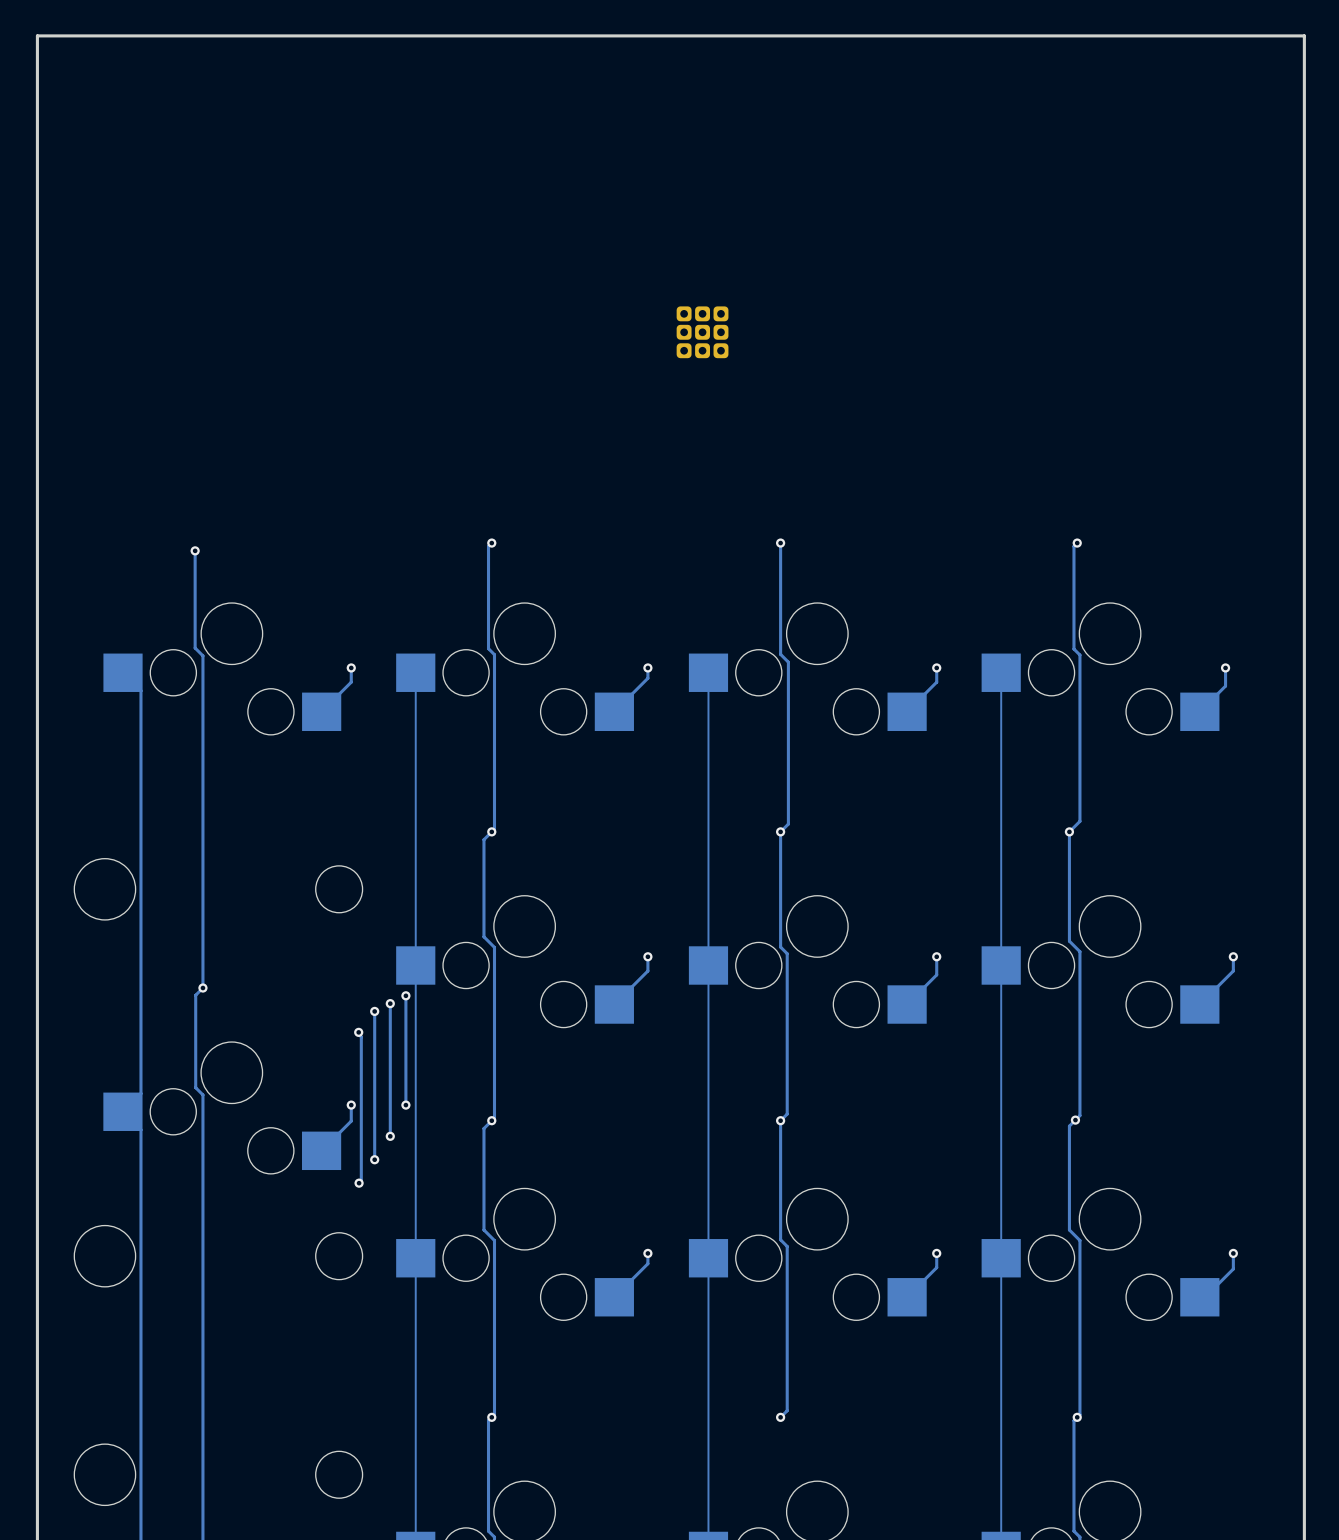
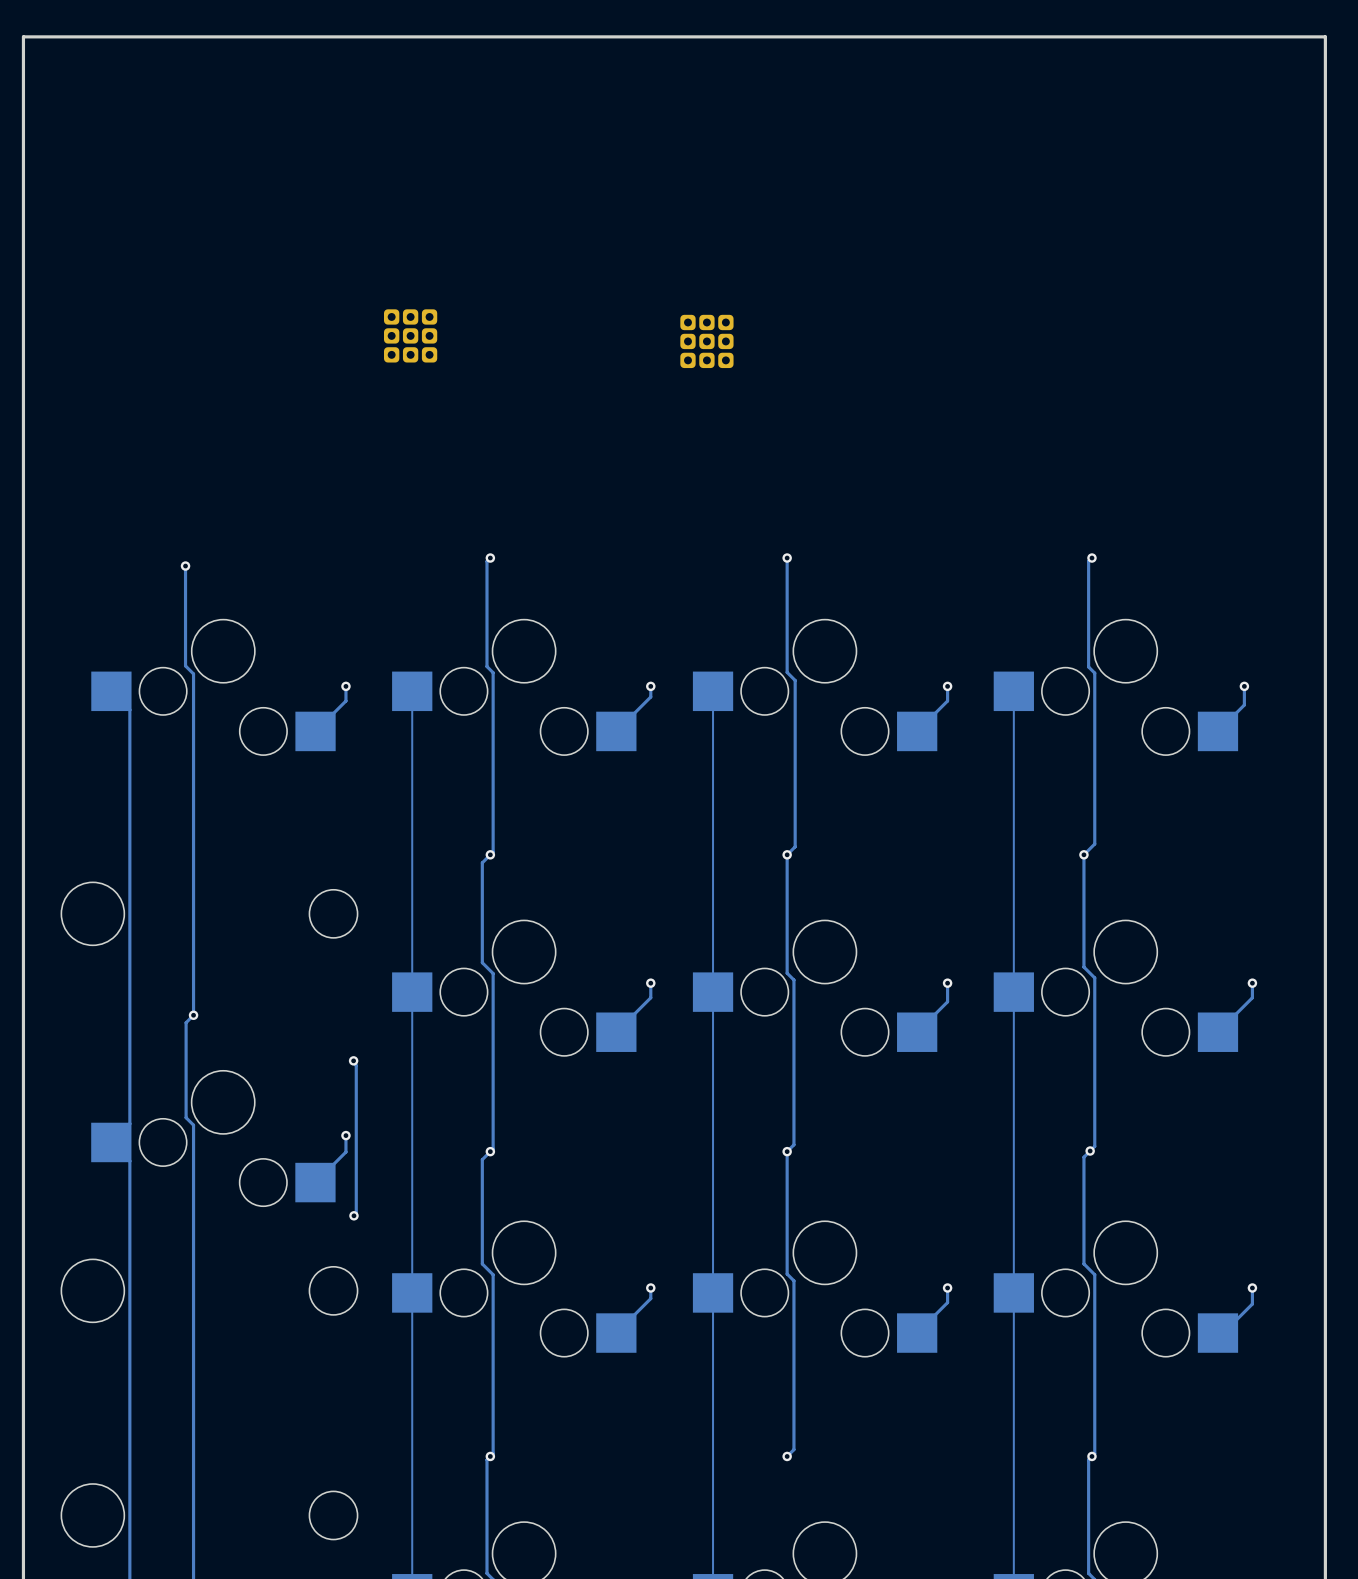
part: none -> (410, 335)
track: (405, 995) (405, 1105) -> none
via: (405, 995) -> none
track: (390, 1003) (390, 1136) -> none
via: (390, 1003) -> none
track: (374, 1011) (374, 1159) -> none
via: (374, 1011) -> none
via: (405, 1105) -> none
via: (390, 1136) -> none
via: (374, 1159) -> none

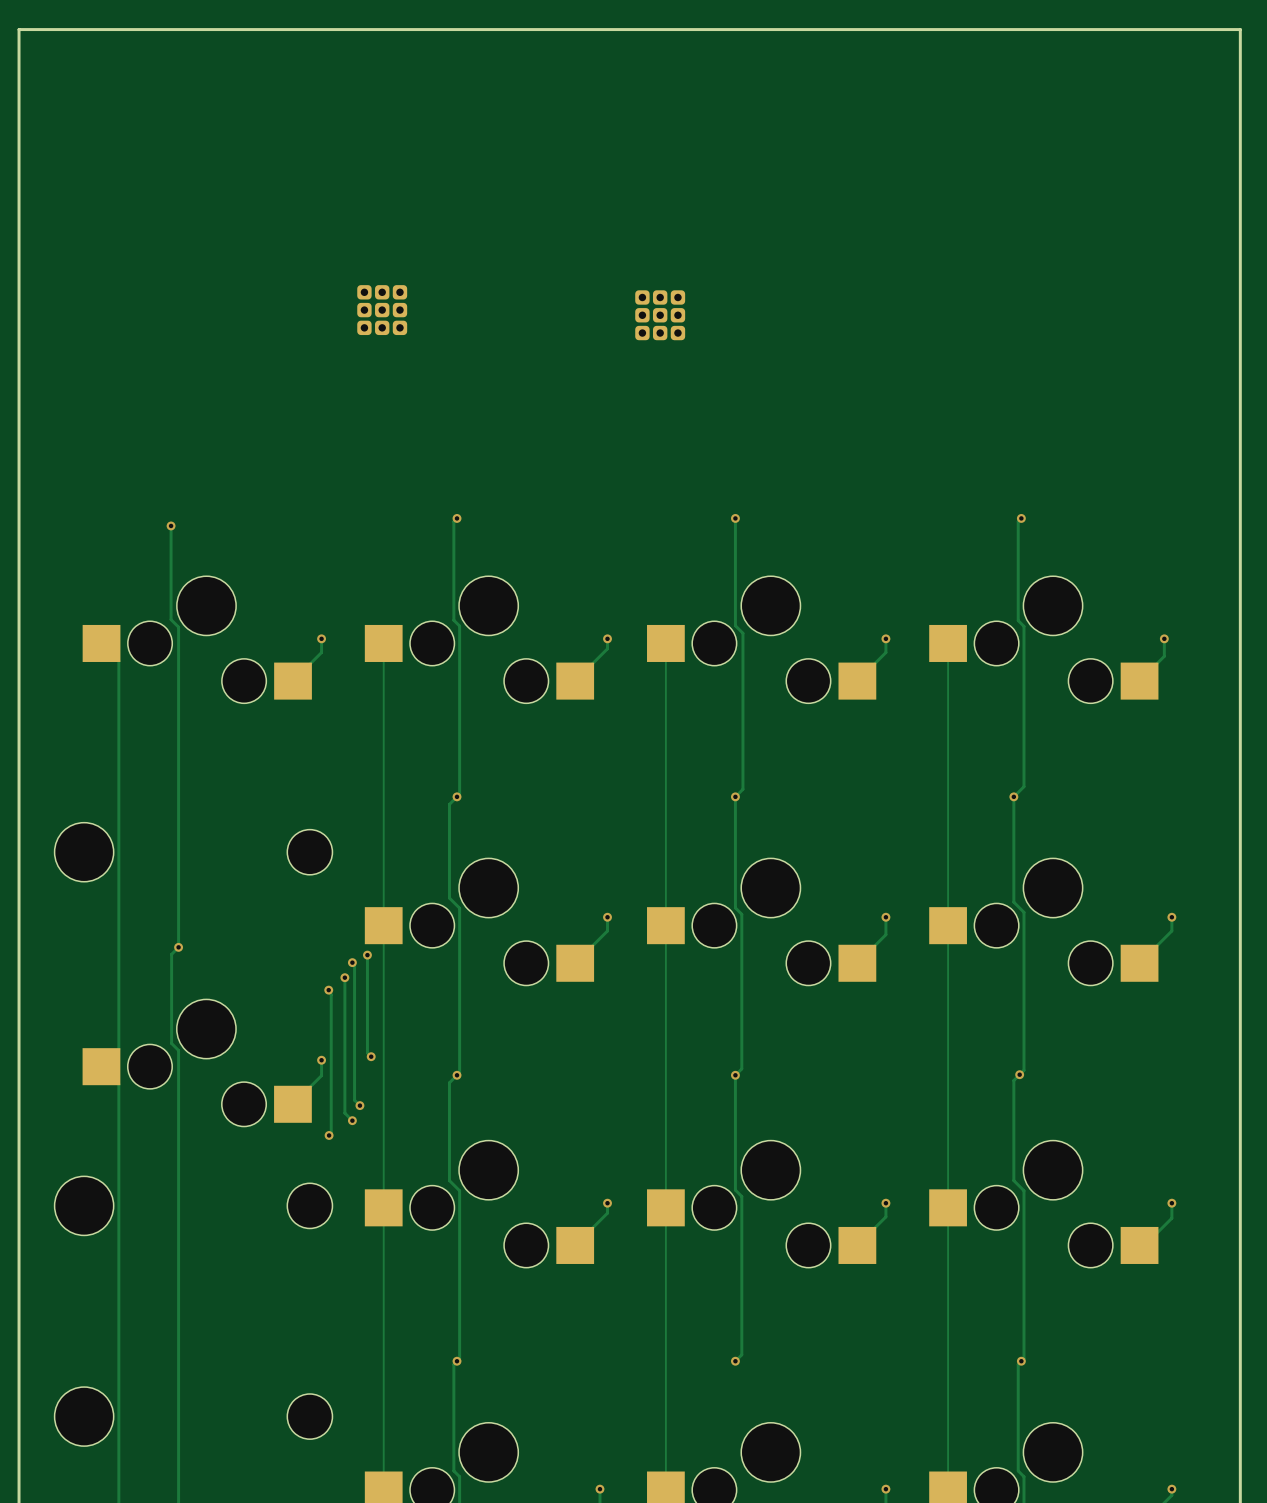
track: none -> (367, 955) (367, 1052) (371, 1056)
via: none -> (367, 955)
track: none -> (352, 962) (354, 964) (354, 1100) (359, 1105)
via: none -> (352, 962)
track: none -> (344, 977) (344, 1113) (352, 1120)
via: none -> (344, 977)
via: none -> (371, 1056)
via: none -> (359, 1105)
via: none -> (352, 1120)

